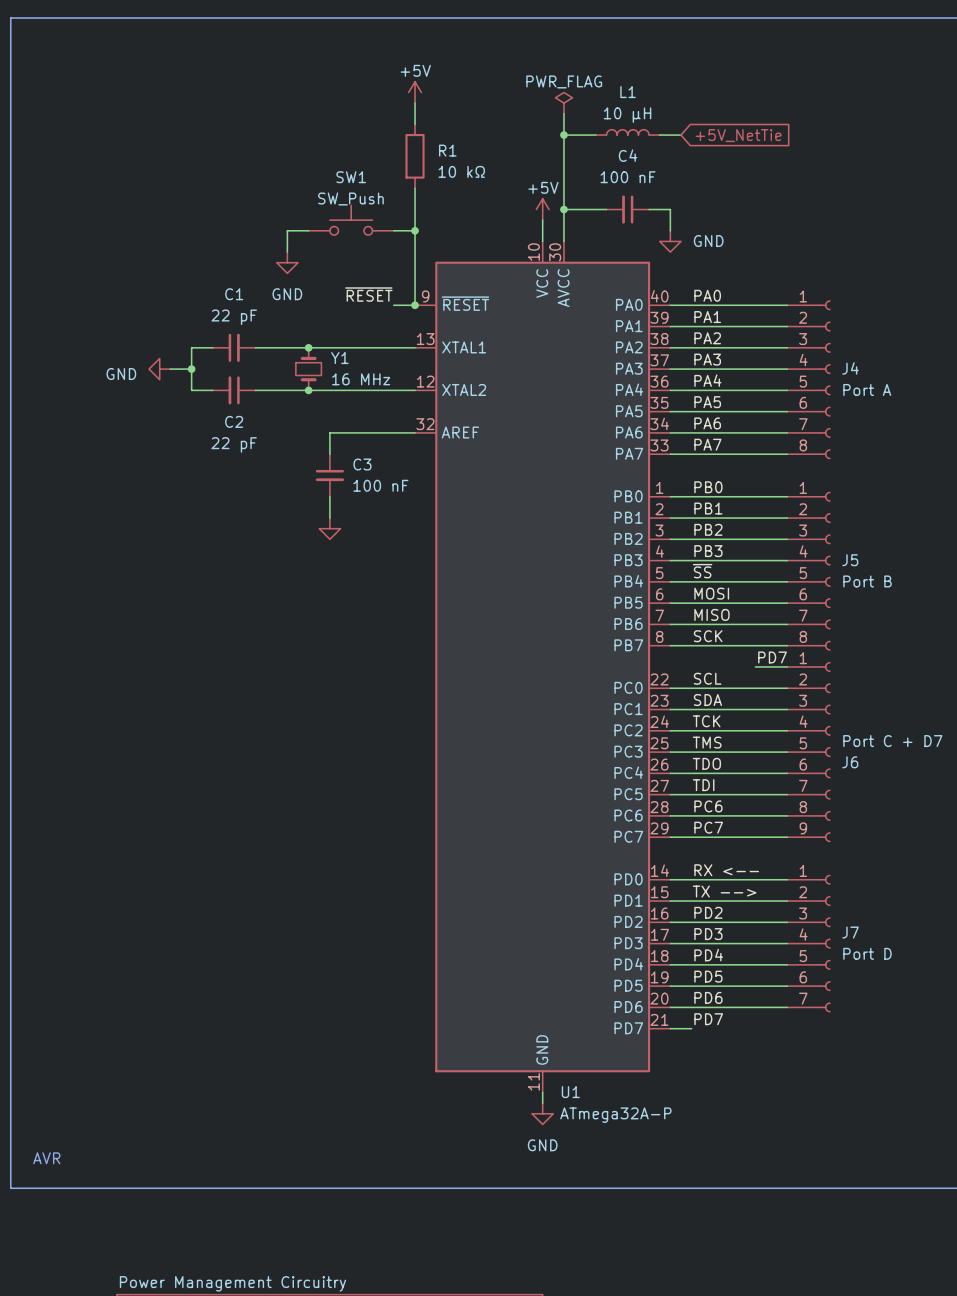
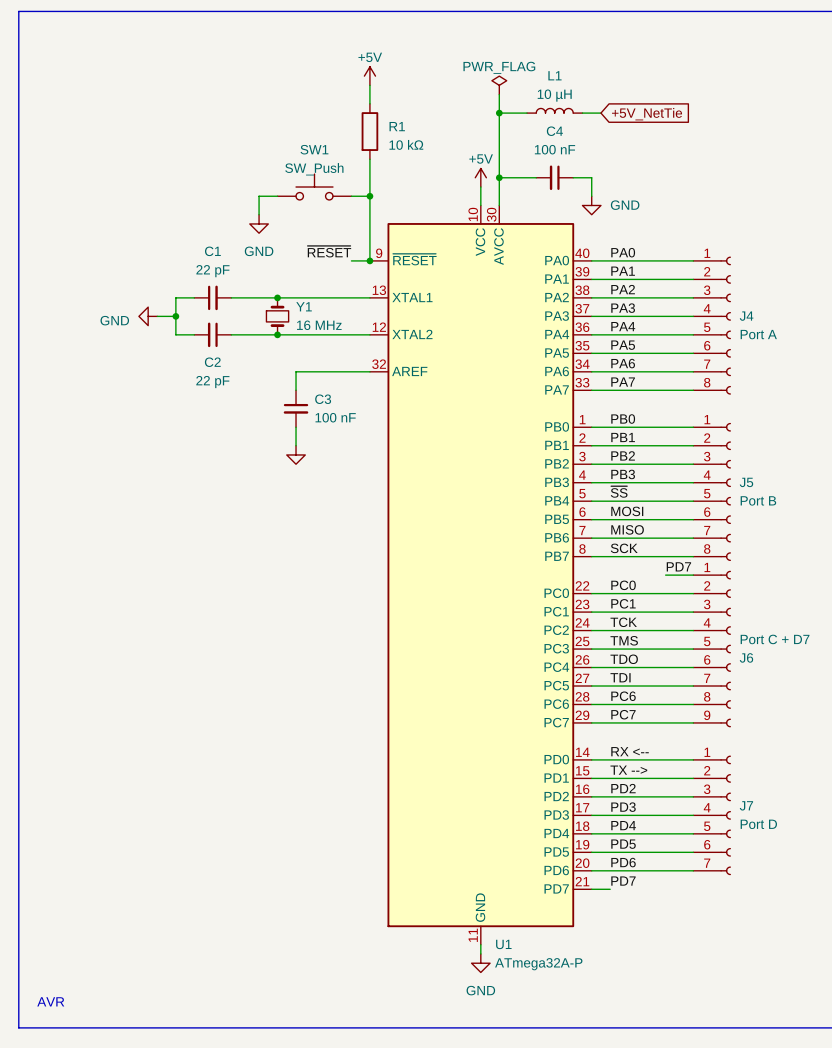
label: SCL (707, 678) -> PC0 (623, 585)
label: SDA (707, 700) -> PC1 (623, 603)

